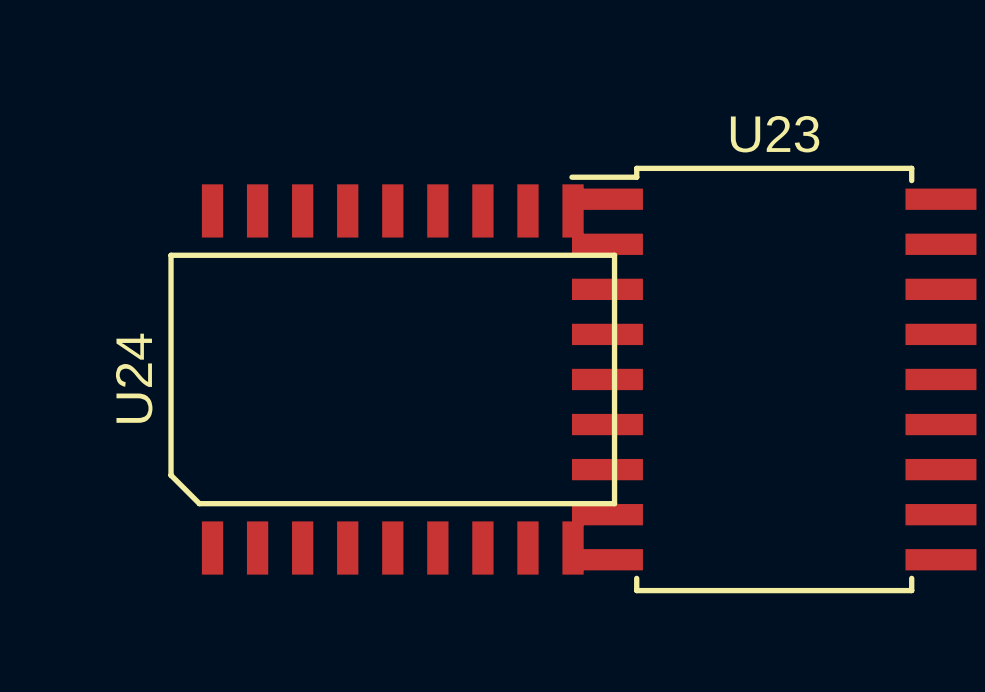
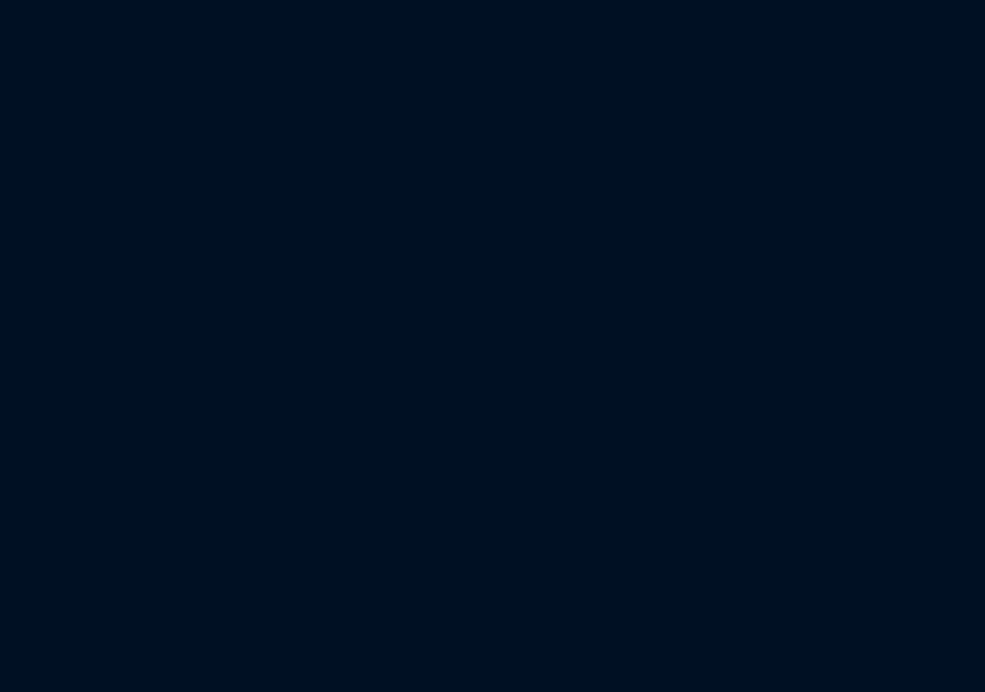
U24: (392, 379) -> none
U23: (772, 379) -> none

